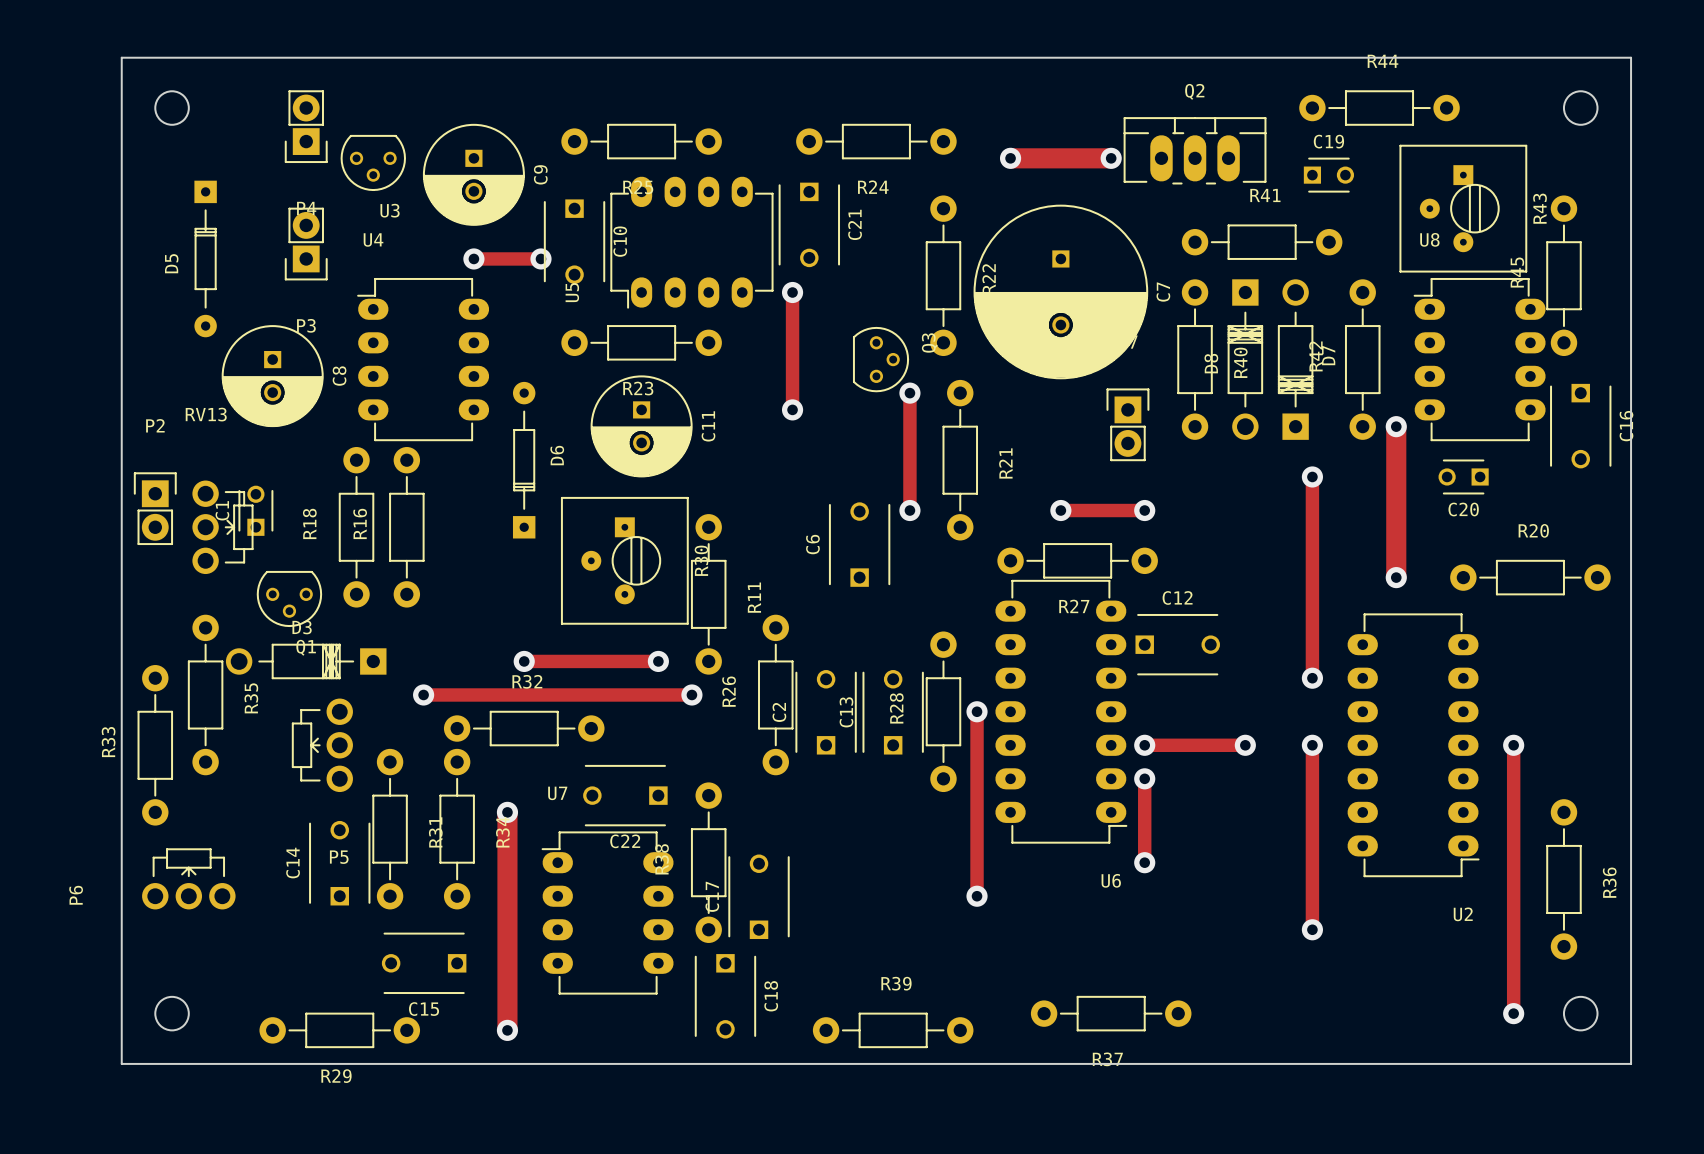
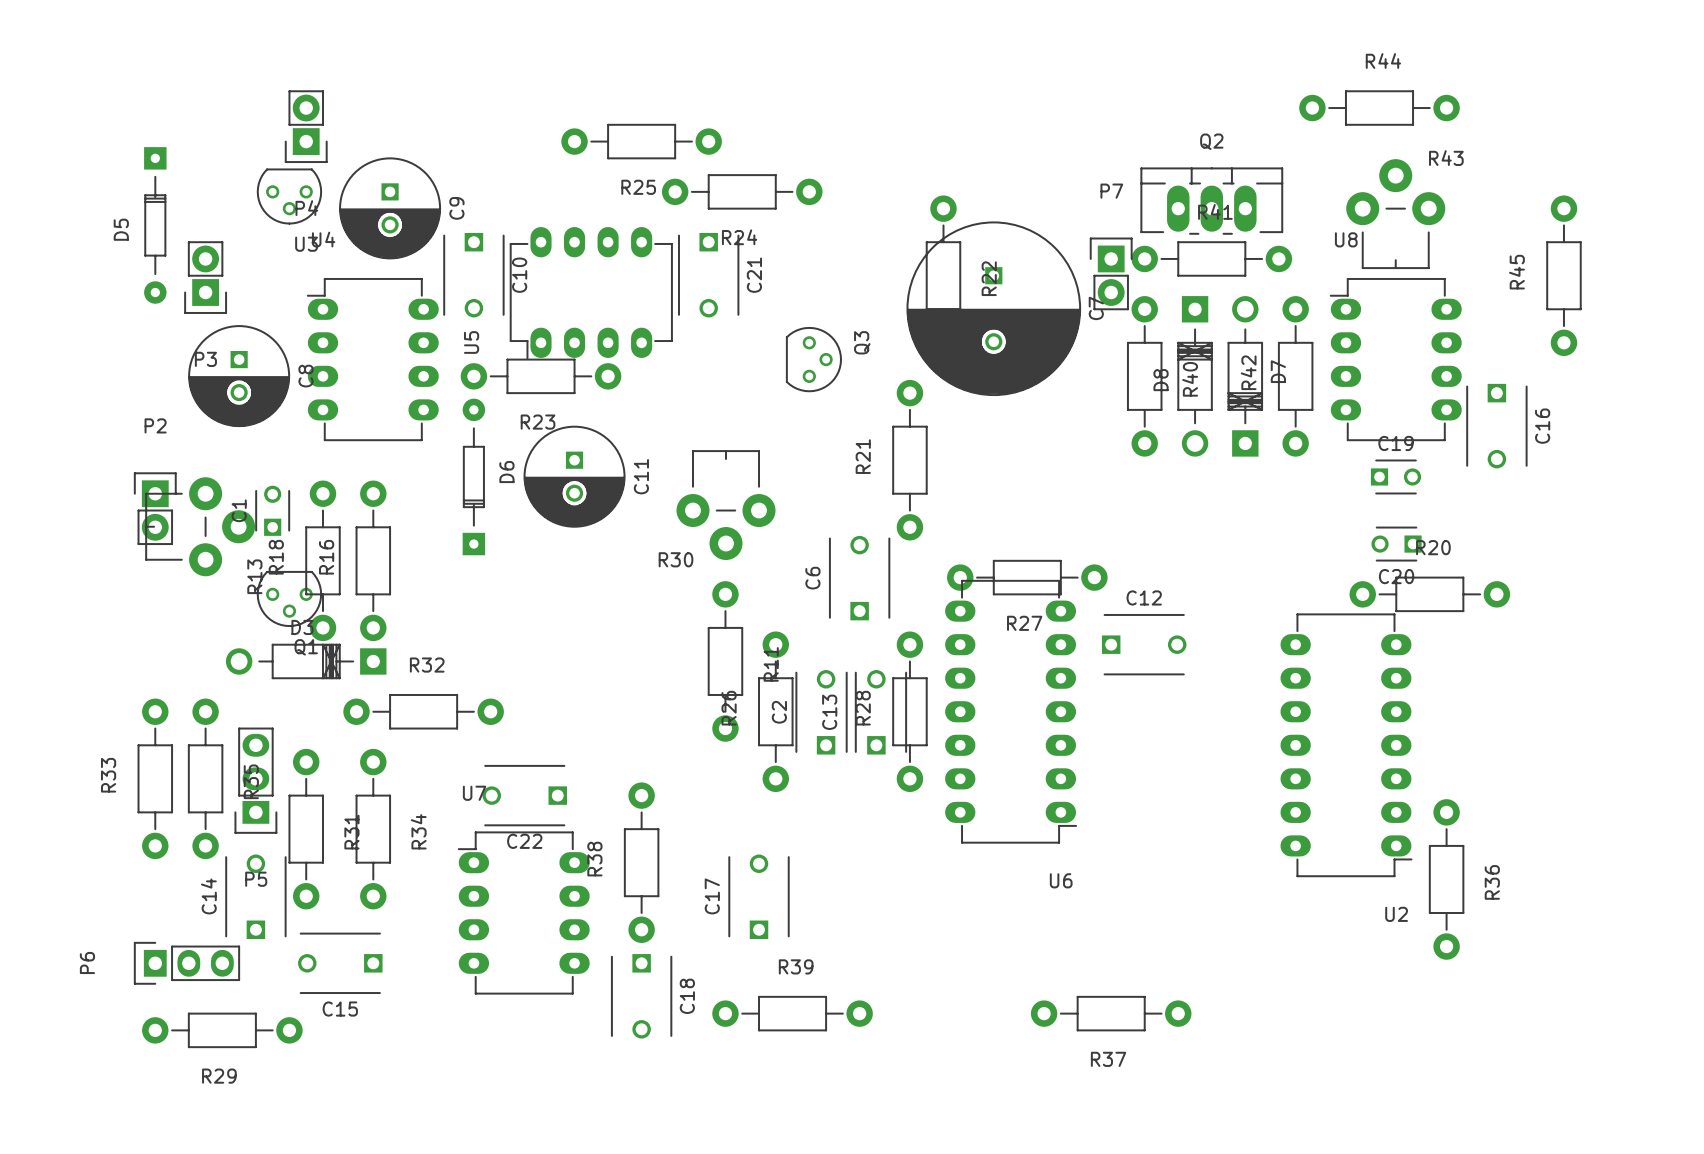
board edge: (121, 57) (121, 1063) (1631, 1063) (1631, 57) (121, 57) -> none
round board edge: [154, 90, 190, 126] -> none
round board edge: [1562, 90, 1599, 126] -> none
R24 position: (876, 141) -> (742, 191)
R43 footprint: [1399, 144, 1528, 273] -> [1346, 159, 1446, 270]
Q2 position: (1195, 150) -> (1211, 201)
track: (1010, 158) (1111, 158) -> none
via: (1010, 158) -> none
via: (1111, 158) -> none
U3 position: (373, 162) -> (289, 196)
C9 position: (473, 174) -> (390, 208)
C19 position: (1328, 175) -> (1396, 476)
R43 name position: R43 (1540, 208) -> R43 (1446, 158)
C21 position: (809, 224) -> (708, 275)
C10 position: (574, 241) -> (473, 275)
U5 position: (691, 242) -> (591, 292)
R41 position: (1262, 242) -> (1211, 258)
P3 position: (306, 244) -> (205, 277)
D5 position: (205, 258) -> (155, 225)
track: (473, 258) (541, 258) -> none
via: (473, 258) -> none
via: (541, 258) -> none
C7 position: (1060, 291) -> (993, 308)
track: (792, 292) (792, 409) -> none
via: (792, 292) -> none
R23 position: (641, 342) -> (541, 376)
U4 position: (423, 359) -> (372, 359)
Q3 position: (881, 359) -> (813, 359)
R40 position: (1195, 359) -> (1144, 376)
D8 position: (1245, 359) -> (1195, 376)
D7 position: (1295, 359) -> (1245, 376)
R42 position: (1362, 359) -> (1295, 376)
U8 position: (1479, 359) -> (1395, 359)
C8 position: (272, 376) -> (239, 376)
track: (909, 393) (909, 510) -> none
via: (909, 393) -> none
via: (792, 409) -> none
P7 position: (1127, 424) -> (1111, 273)
C11 position: (641, 426) -> (574, 476)
track: (1396, 426) (1396, 577) -> none
via: (1396, 426) -> none
C16 position: (1580, 426) -> (1496, 426)
D6 position: (524, 460) -> (473, 476)
R21 position: (960, 460) -> (909, 460)
R21 name position: R21 (1005, 463) -> R21 (863, 456)
track: (1312, 476) (1312, 678) -> none
via: (1312, 476) -> none
C20 position: (1463, 476) -> (1396, 544)
R30 footprint: [560, 496, 689, 625] -> [676, 450, 776, 561]
C1 position: (255, 510) -> (272, 510)
via: (909, 510) -> none
track: (1060, 510) (1144, 510) -> none
via: (1060, 510) -> none
via: (1144, 510) -> none
R13: none -> (200, 526)
RV13: (222, 527) -> none
R18 position: (356, 527) -> (322, 560)
R16 position: (406, 527) -> (373, 560)
C6 position: (859, 544) -> (859, 578)
R30 name position: R30 (701, 560) -> R30 (676, 559)
R27 position: (1077, 560) -> (1027, 577)
via: (1396, 577) -> none
R20 position: (1530, 577) -> (1429, 594)
R11 position: (708, 594) -> (725, 661)
C12 position: (1177, 644) -> (1144, 644)
track: (524, 661) (658, 661) -> none
via: (524, 661) -> none
via: (658, 661) -> none
via: (1312, 678) -> none
R35 position: (205, 694) -> (205, 778)
track: (423, 694) (691, 694) -> none
via: (423, 694) -> none
via: (691, 694) -> none
R26 position: (775, 694) -> (775, 711)
P5 footprint: [291, 698, 353, 793] -> [234, 727, 278, 834]
R28 position: (943, 711) -> (909, 711)
track: (977, 711) (977, 896) -> none
via: (977, 711) -> none
U6 position: (1061, 711) -> (1011, 711)
C13 position: (893, 712) -> (876, 712)
R32 position: (524, 728) -> (423, 711)
R33 position: (155, 745) -> (155, 778)
track: (1144, 745) (1245, 745) -> none
via: (1144, 745) -> none
via: (1245, 745) -> none
track: (1312, 745) (1312, 929) -> none
via: (1312, 745) -> none
U2 position: (1413, 745) -> (1346, 745)
track: (1513, 745) (1513, 1013) -> none
via: (1513, 745) -> none
track: (1144, 778) (1144, 862) -> none
via: (1144, 778) -> none
C22 position: (625, 795) -> (524, 795)
track: (507, 812) (507, 1030) -> none
via: (507, 812) -> none
R31 position: (390, 829) -> (306, 829)
R34 position: (457, 829) -> (373, 829)
P6 footprint: [142, 848, 236, 910] -> [133, 941, 241, 985]
R38 position: (708, 862) -> (641, 862)
via: (1144, 862) -> none
C14 position: (339, 863) -> (255, 896)
R36 position: (1563, 879) -> (1446, 879)
via: (977, 896) -> none
U7 position: (607, 912) -> (523, 912)
via: (1312, 929) -> none
C15 position: (424, 963) -> (340, 963)
round board edge: [154, 995, 190, 1032] -> none
round board edge: [1562, 995, 1599, 1032] -> none
C18 position: (725, 996) -> (641, 996)
via: (1513, 1013) -> none
R29 position: (339, 1030) -> (222, 1030)
via: (507, 1030) -> none
R39 position: (893, 1030) -> (792, 1013)

